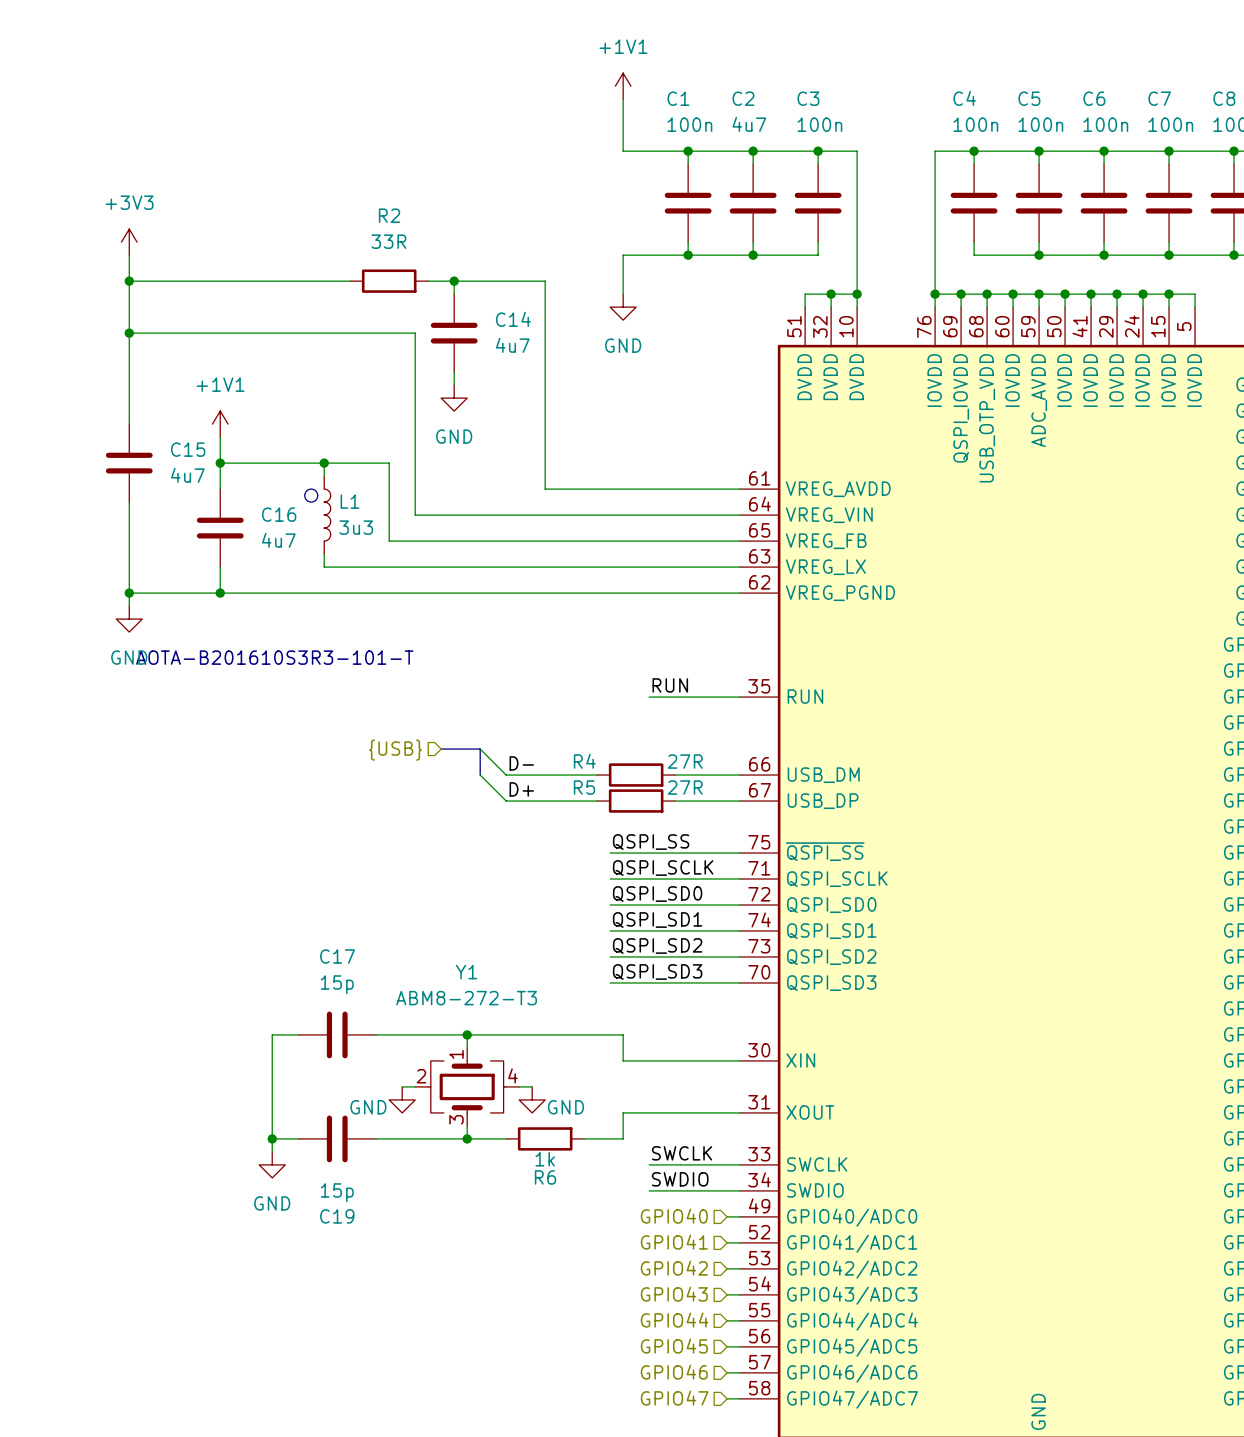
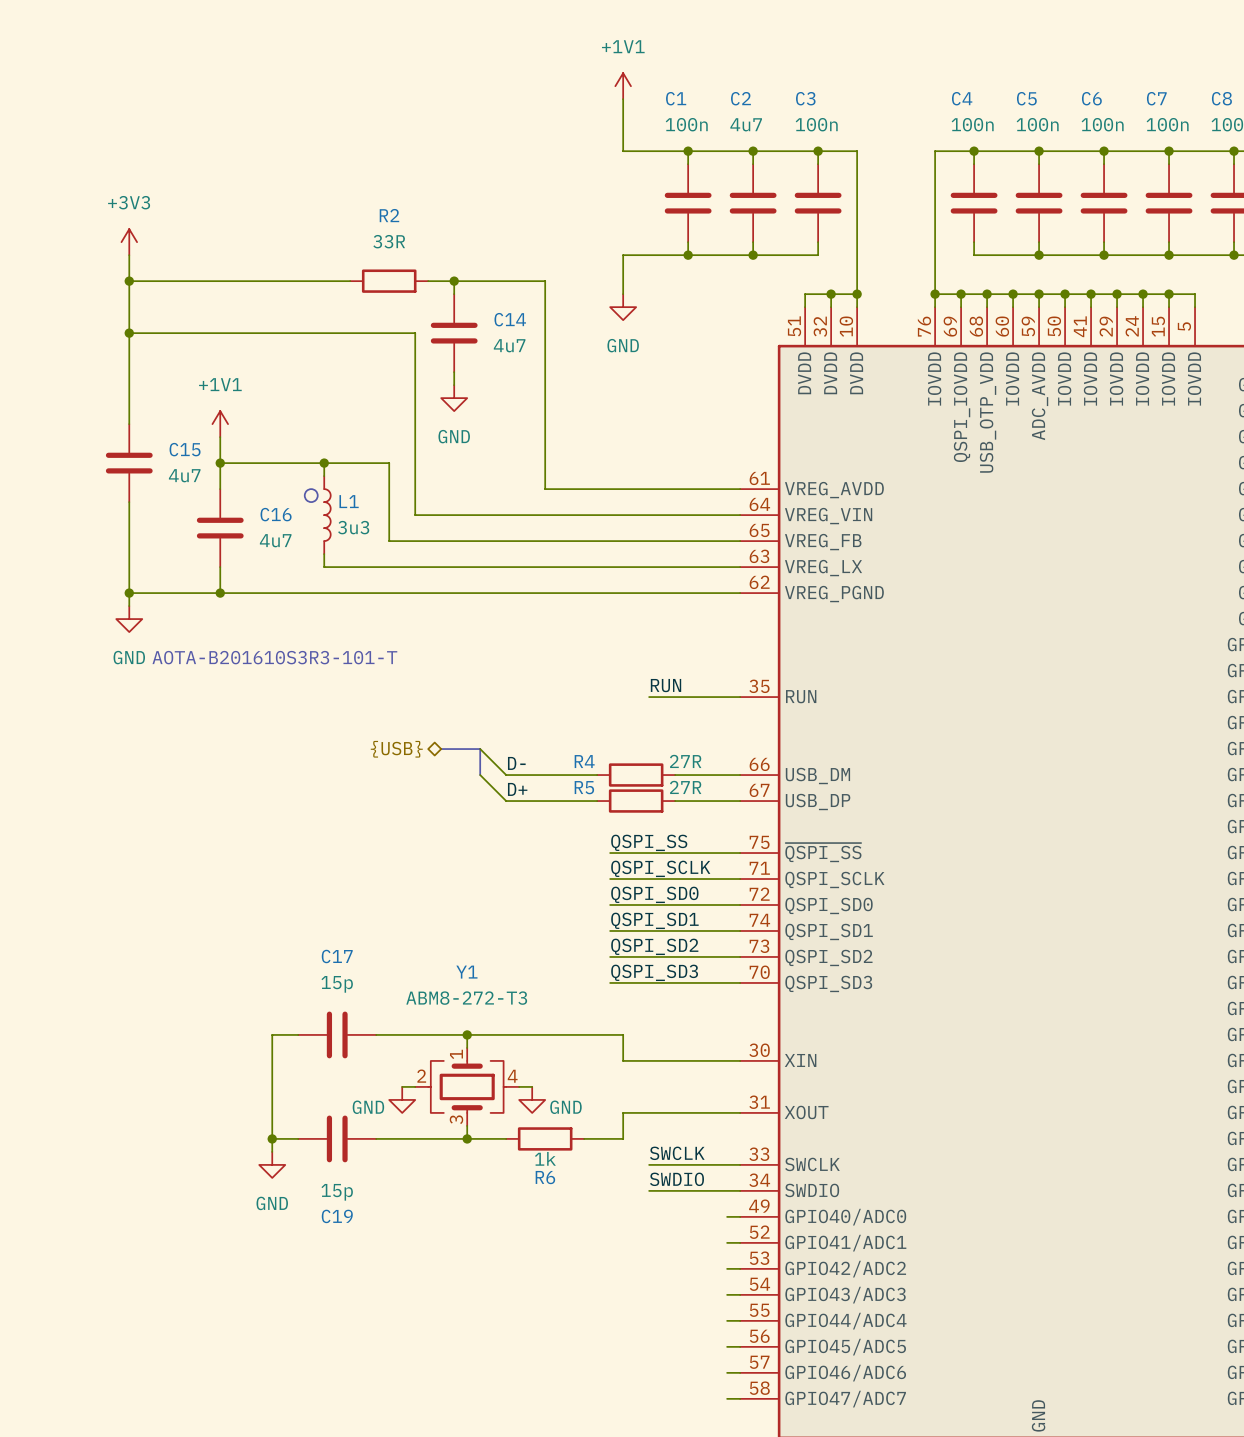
hierarchical label shape: input (395, 750) -> bidirectional (396, 749)
hierarchical label: GPIO40 (674, 1216) -> none
hierarchical label: GPIO41 (674, 1242) -> none
hierarchical label: GPIO42 (674, 1268) -> none
hierarchical label: GPIO43 (674, 1294) -> none
hierarchical label: GPIO44 (674, 1320) -> none
hierarchical label: GPIO45 (674, 1346) -> none
hierarchical label: GPIO46 (674, 1372) -> none
hierarchical label: GPIO47 (674, 1398) -> none

